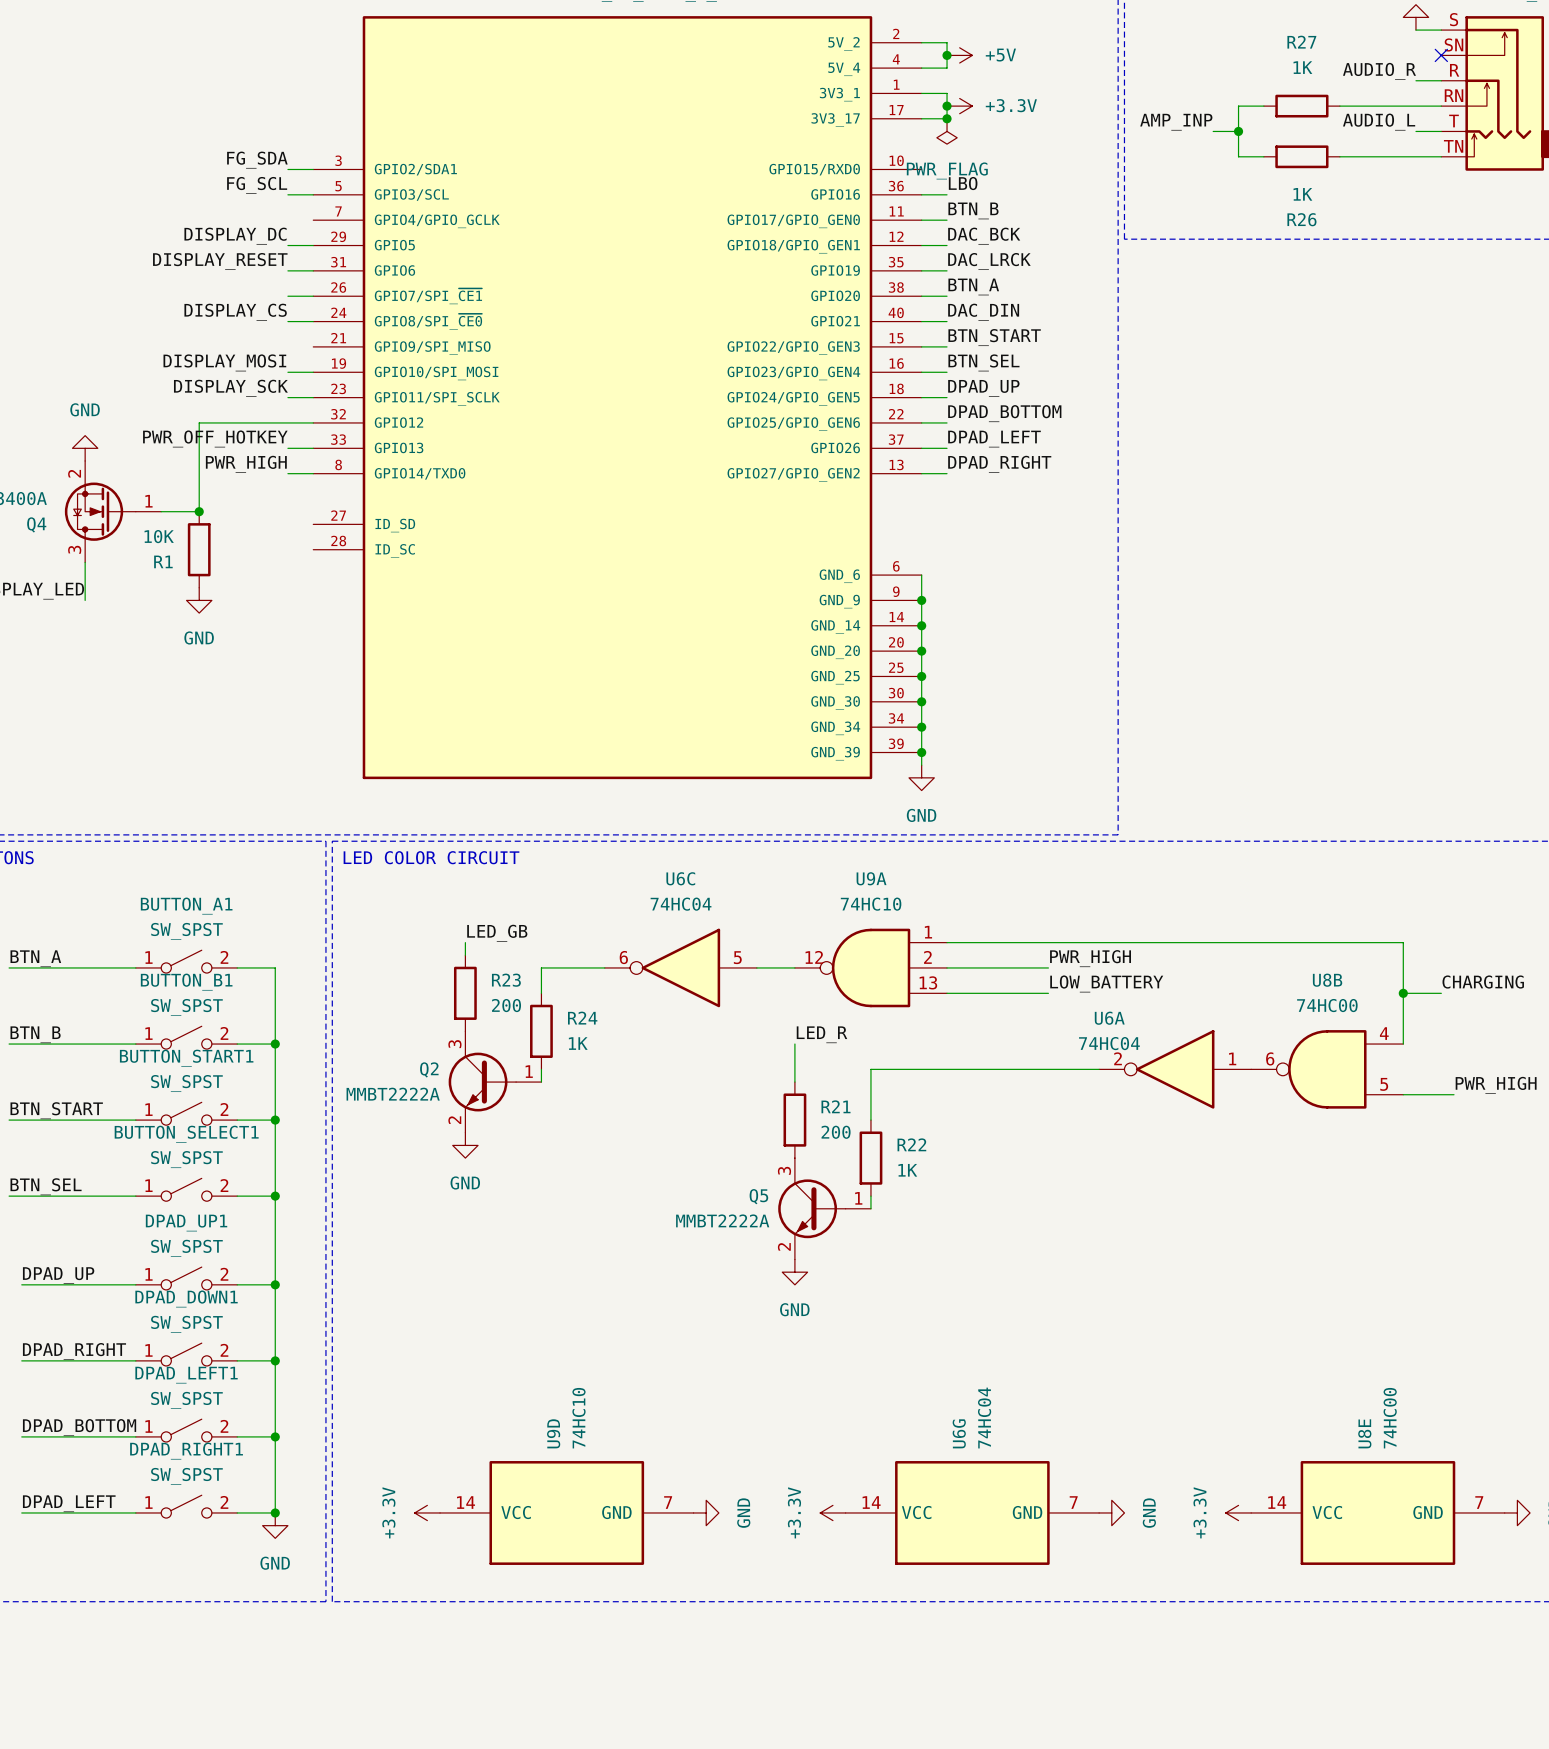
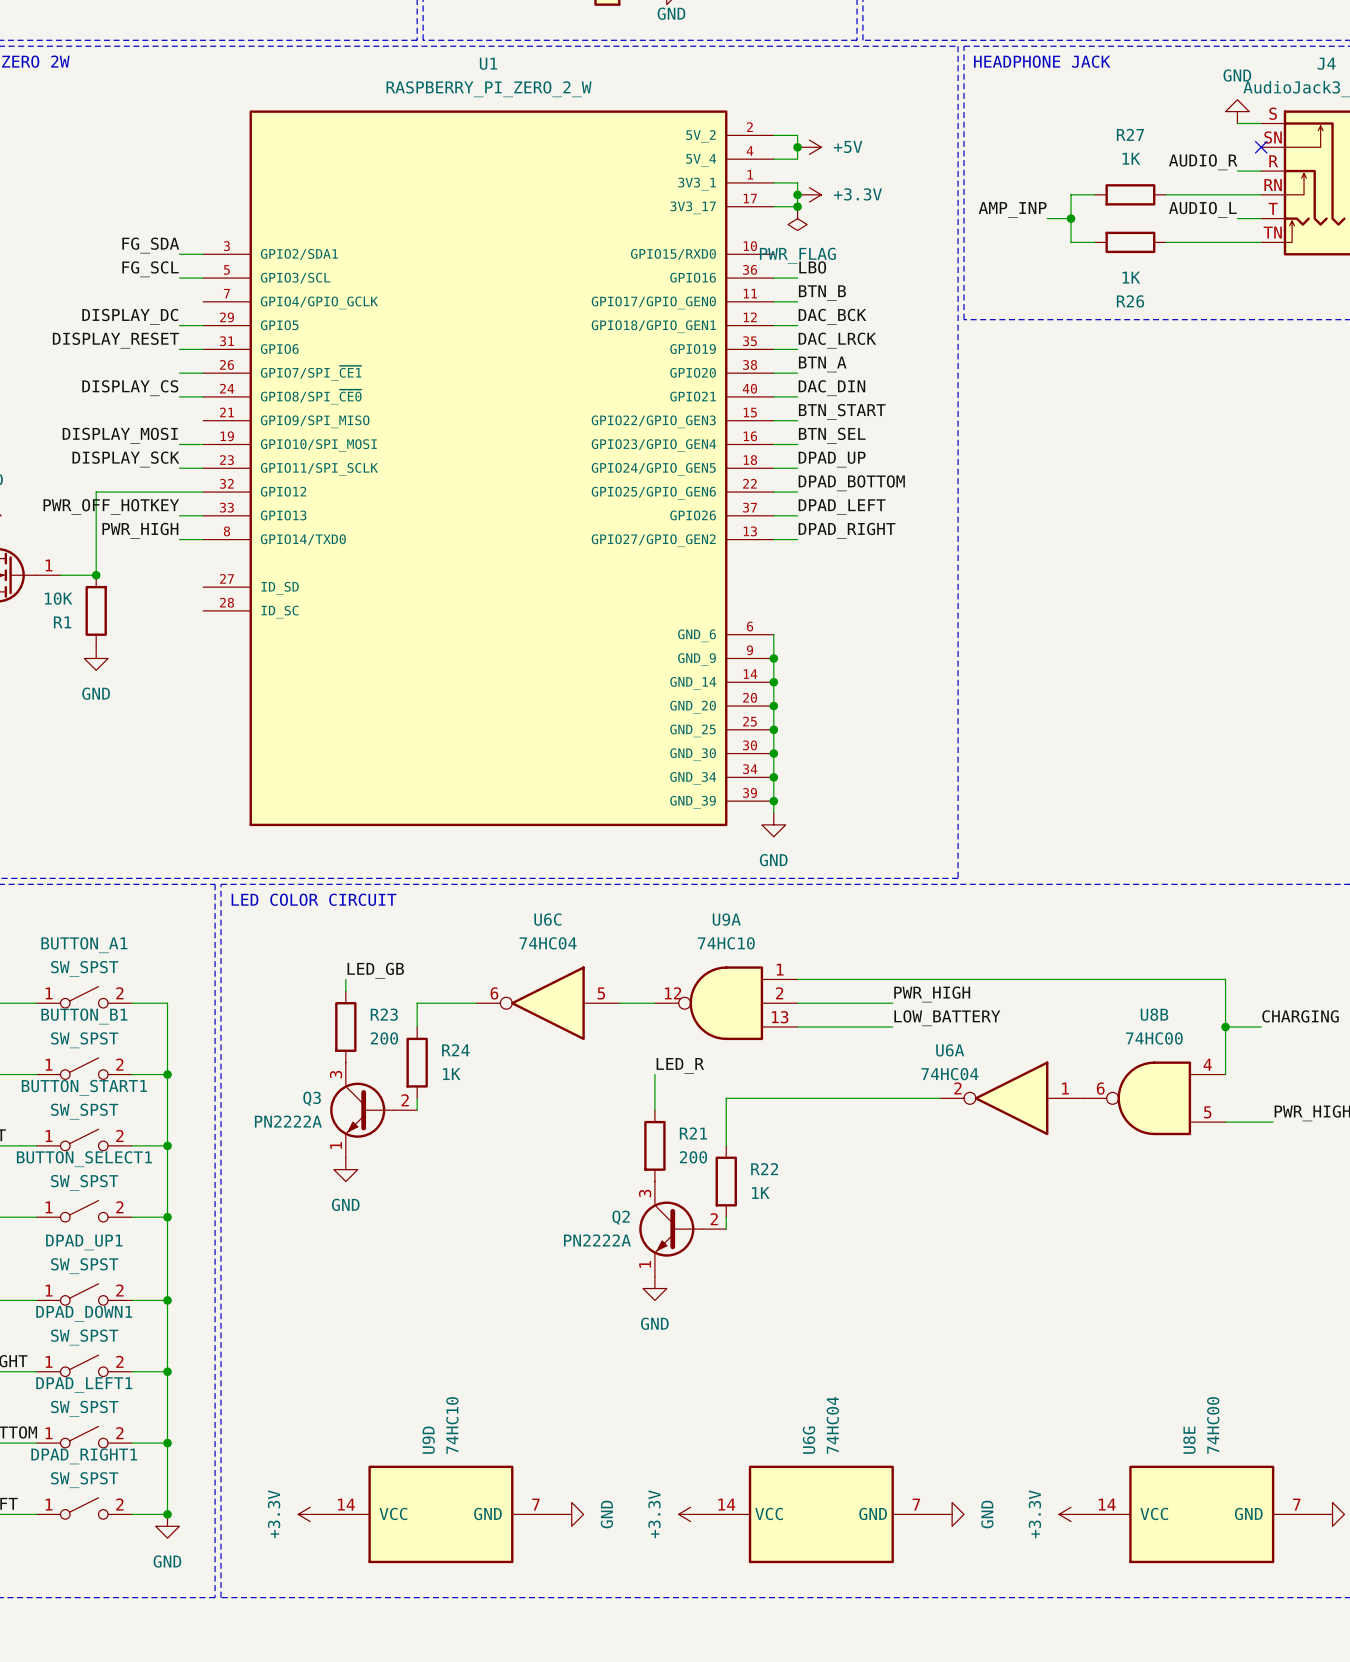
Q2 pin number: 1 (529, 1071) -> 2 (714, 1219)
Q2 position: (495, 1082) -> (682, 1229)
Q3: none -> PN2222A (373, 1110)
Q2 value: MMBT2222A (393, 1094) -> PN2222A (597, 1240)
Q2 pin number: 2 (454, 1120) -> 1 (645, 1264)
Q5: MMBT2222A (824, 1208) -> none

